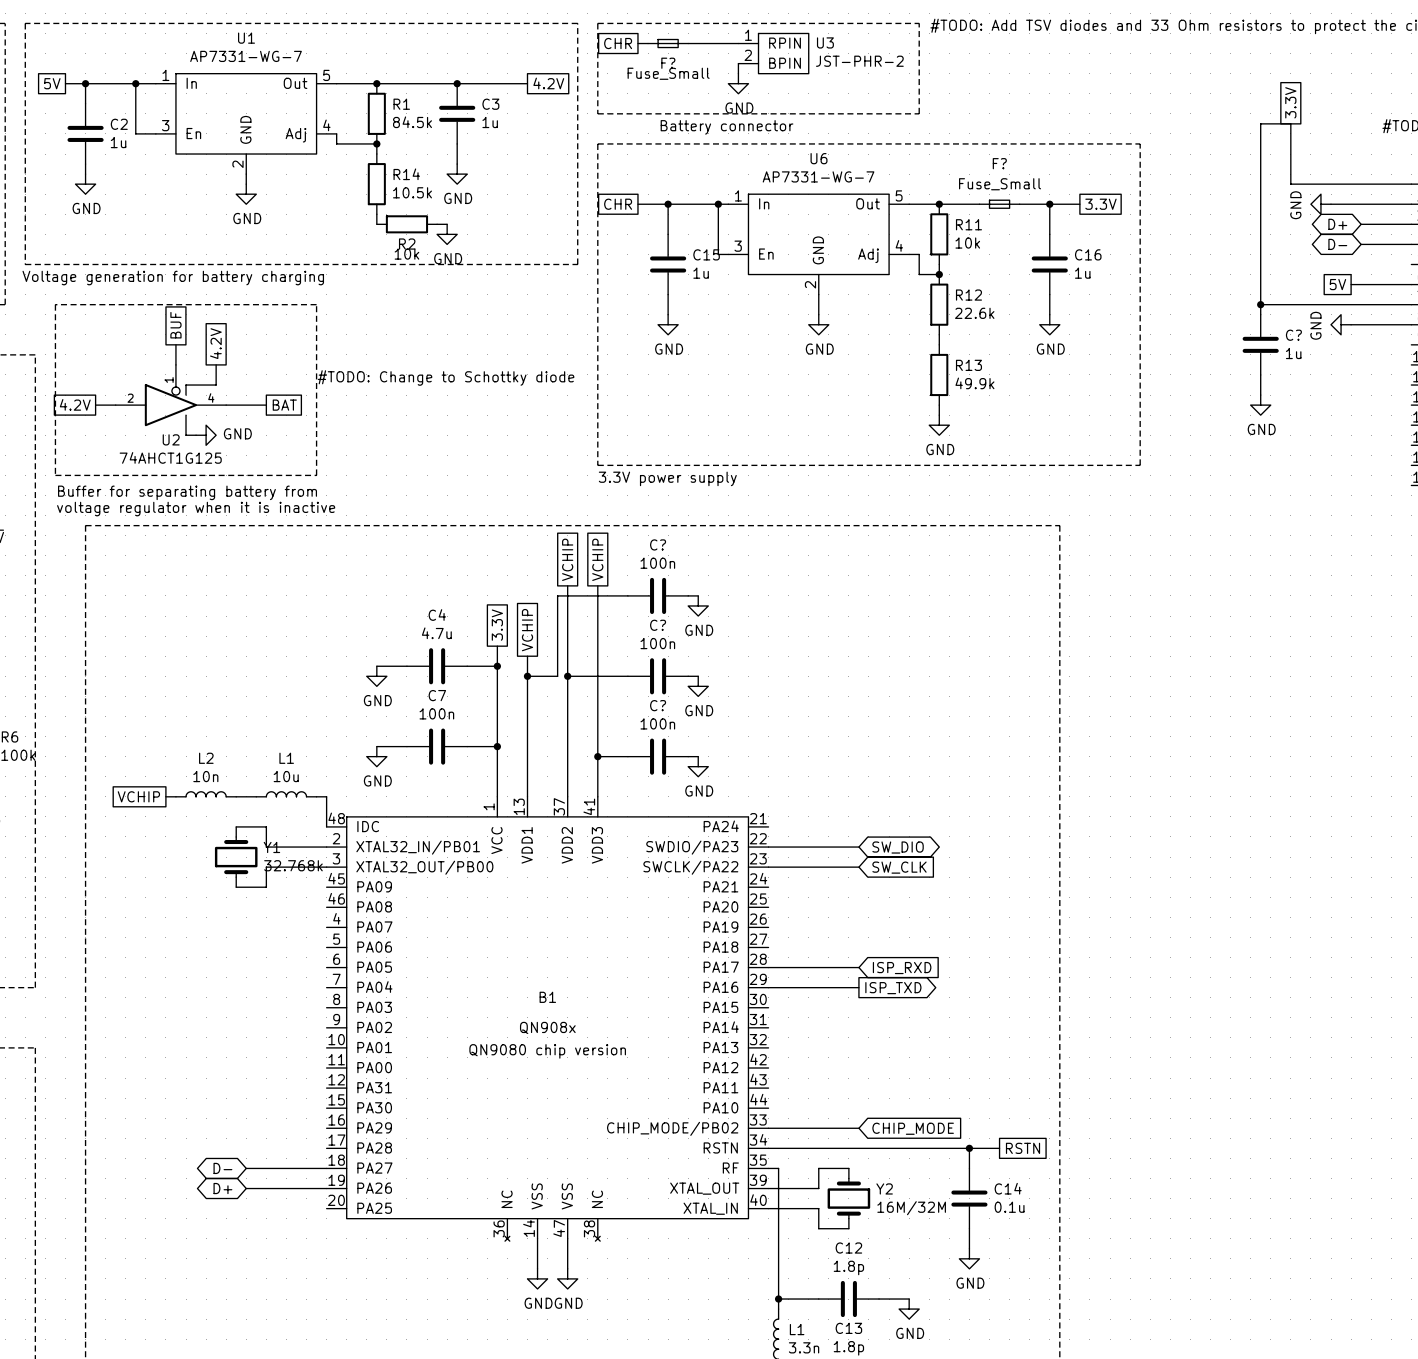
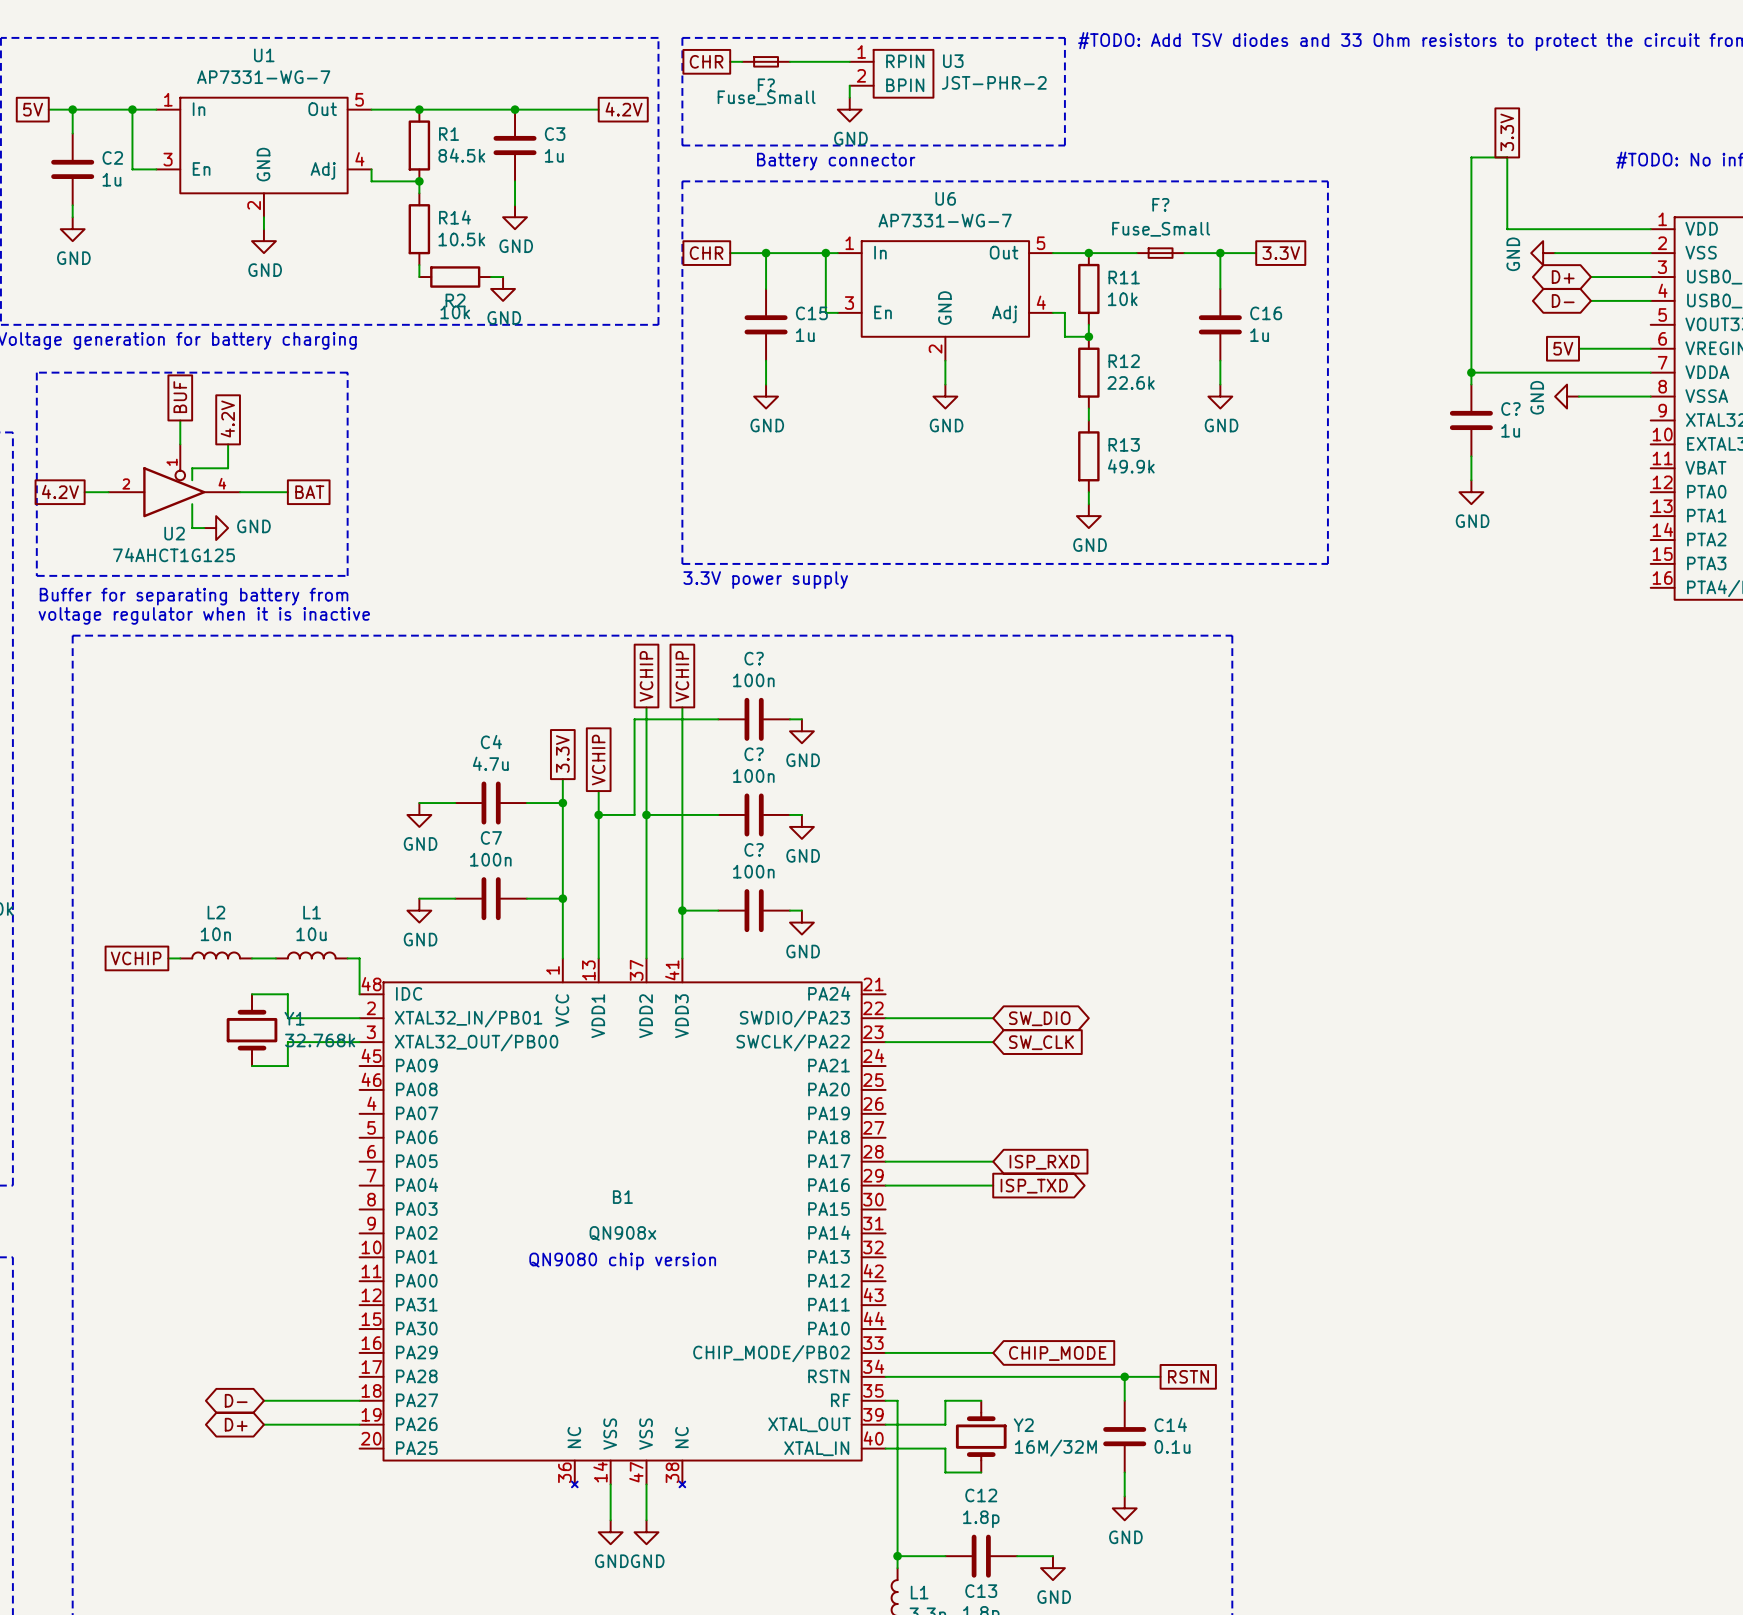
text: #TODO: Change to Schottky diode (446, 377) -> none

